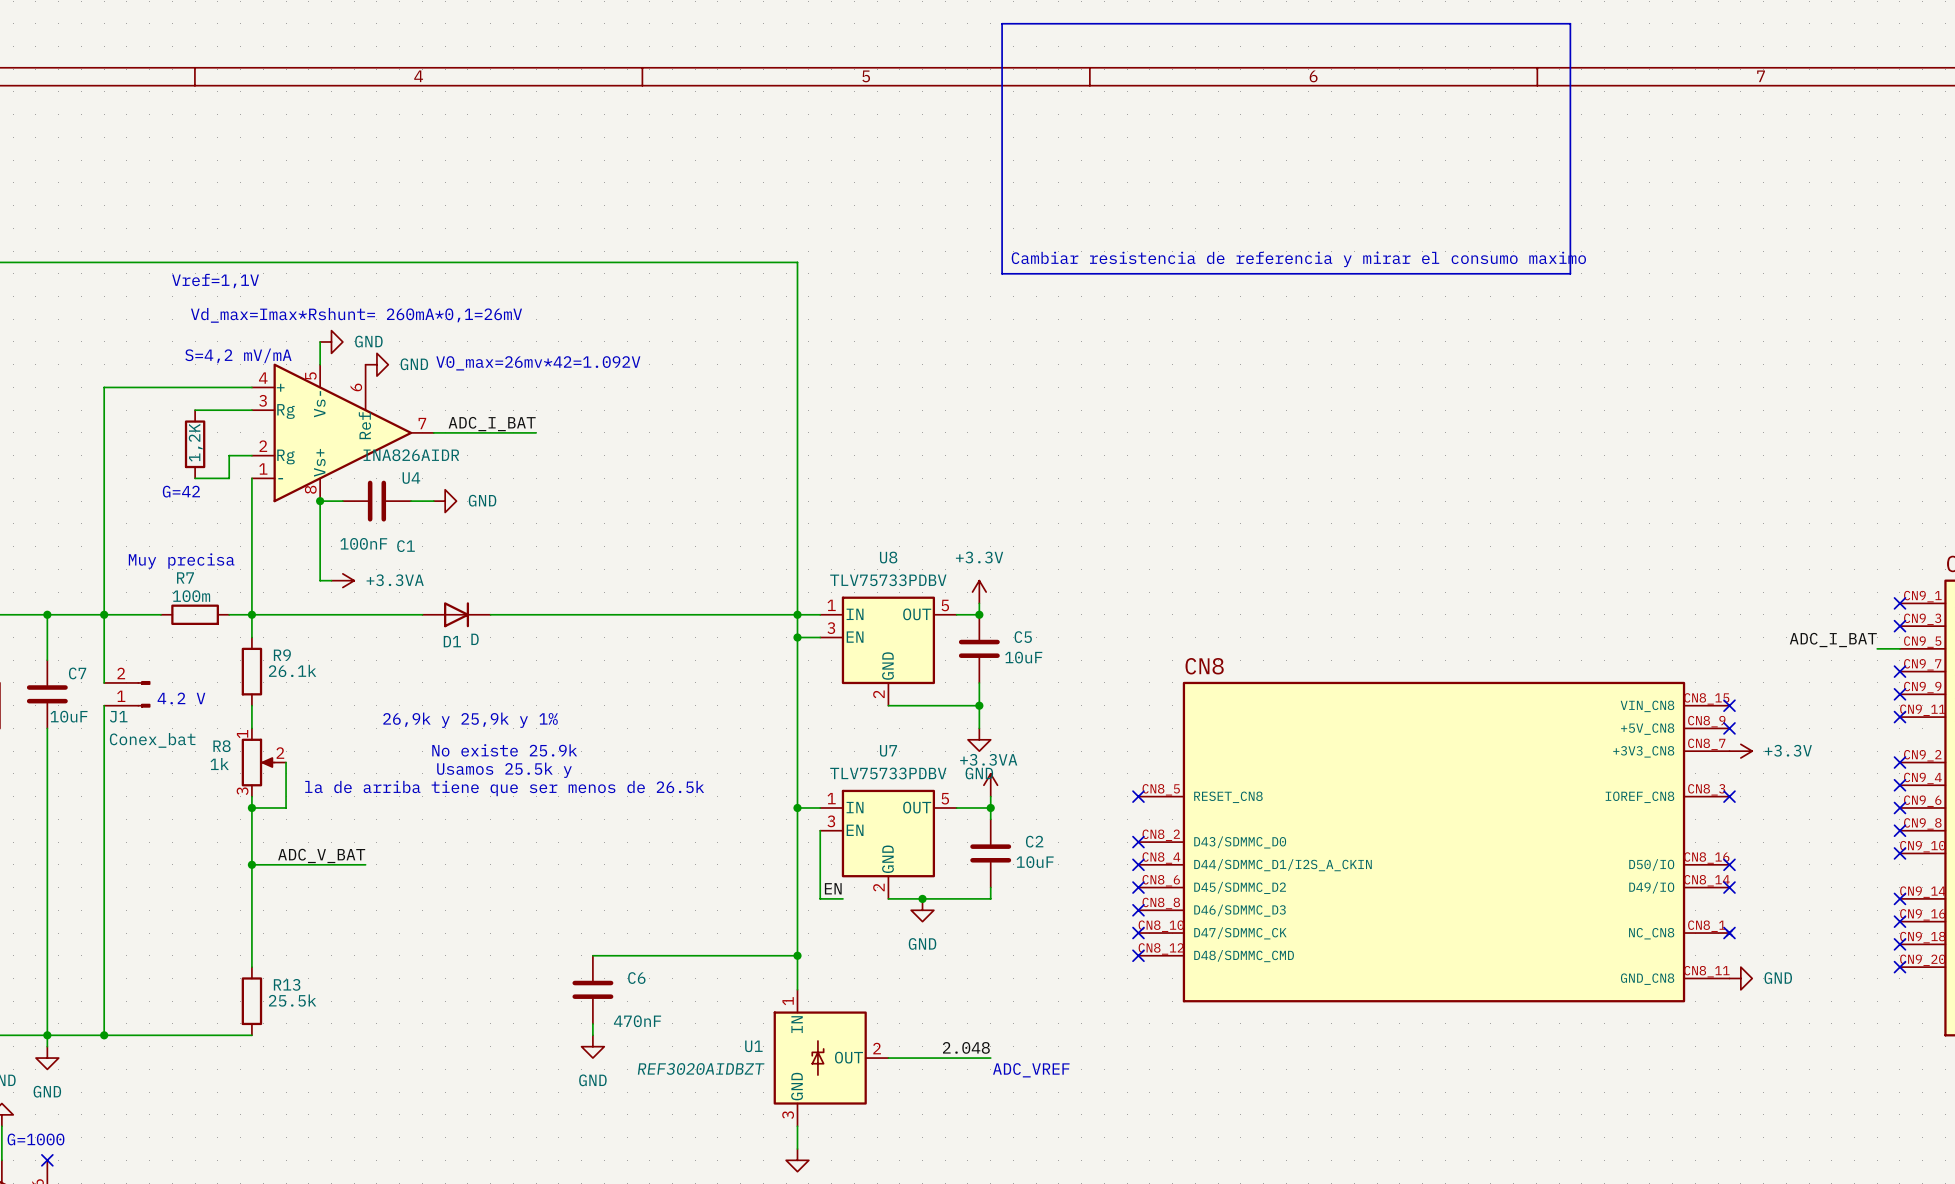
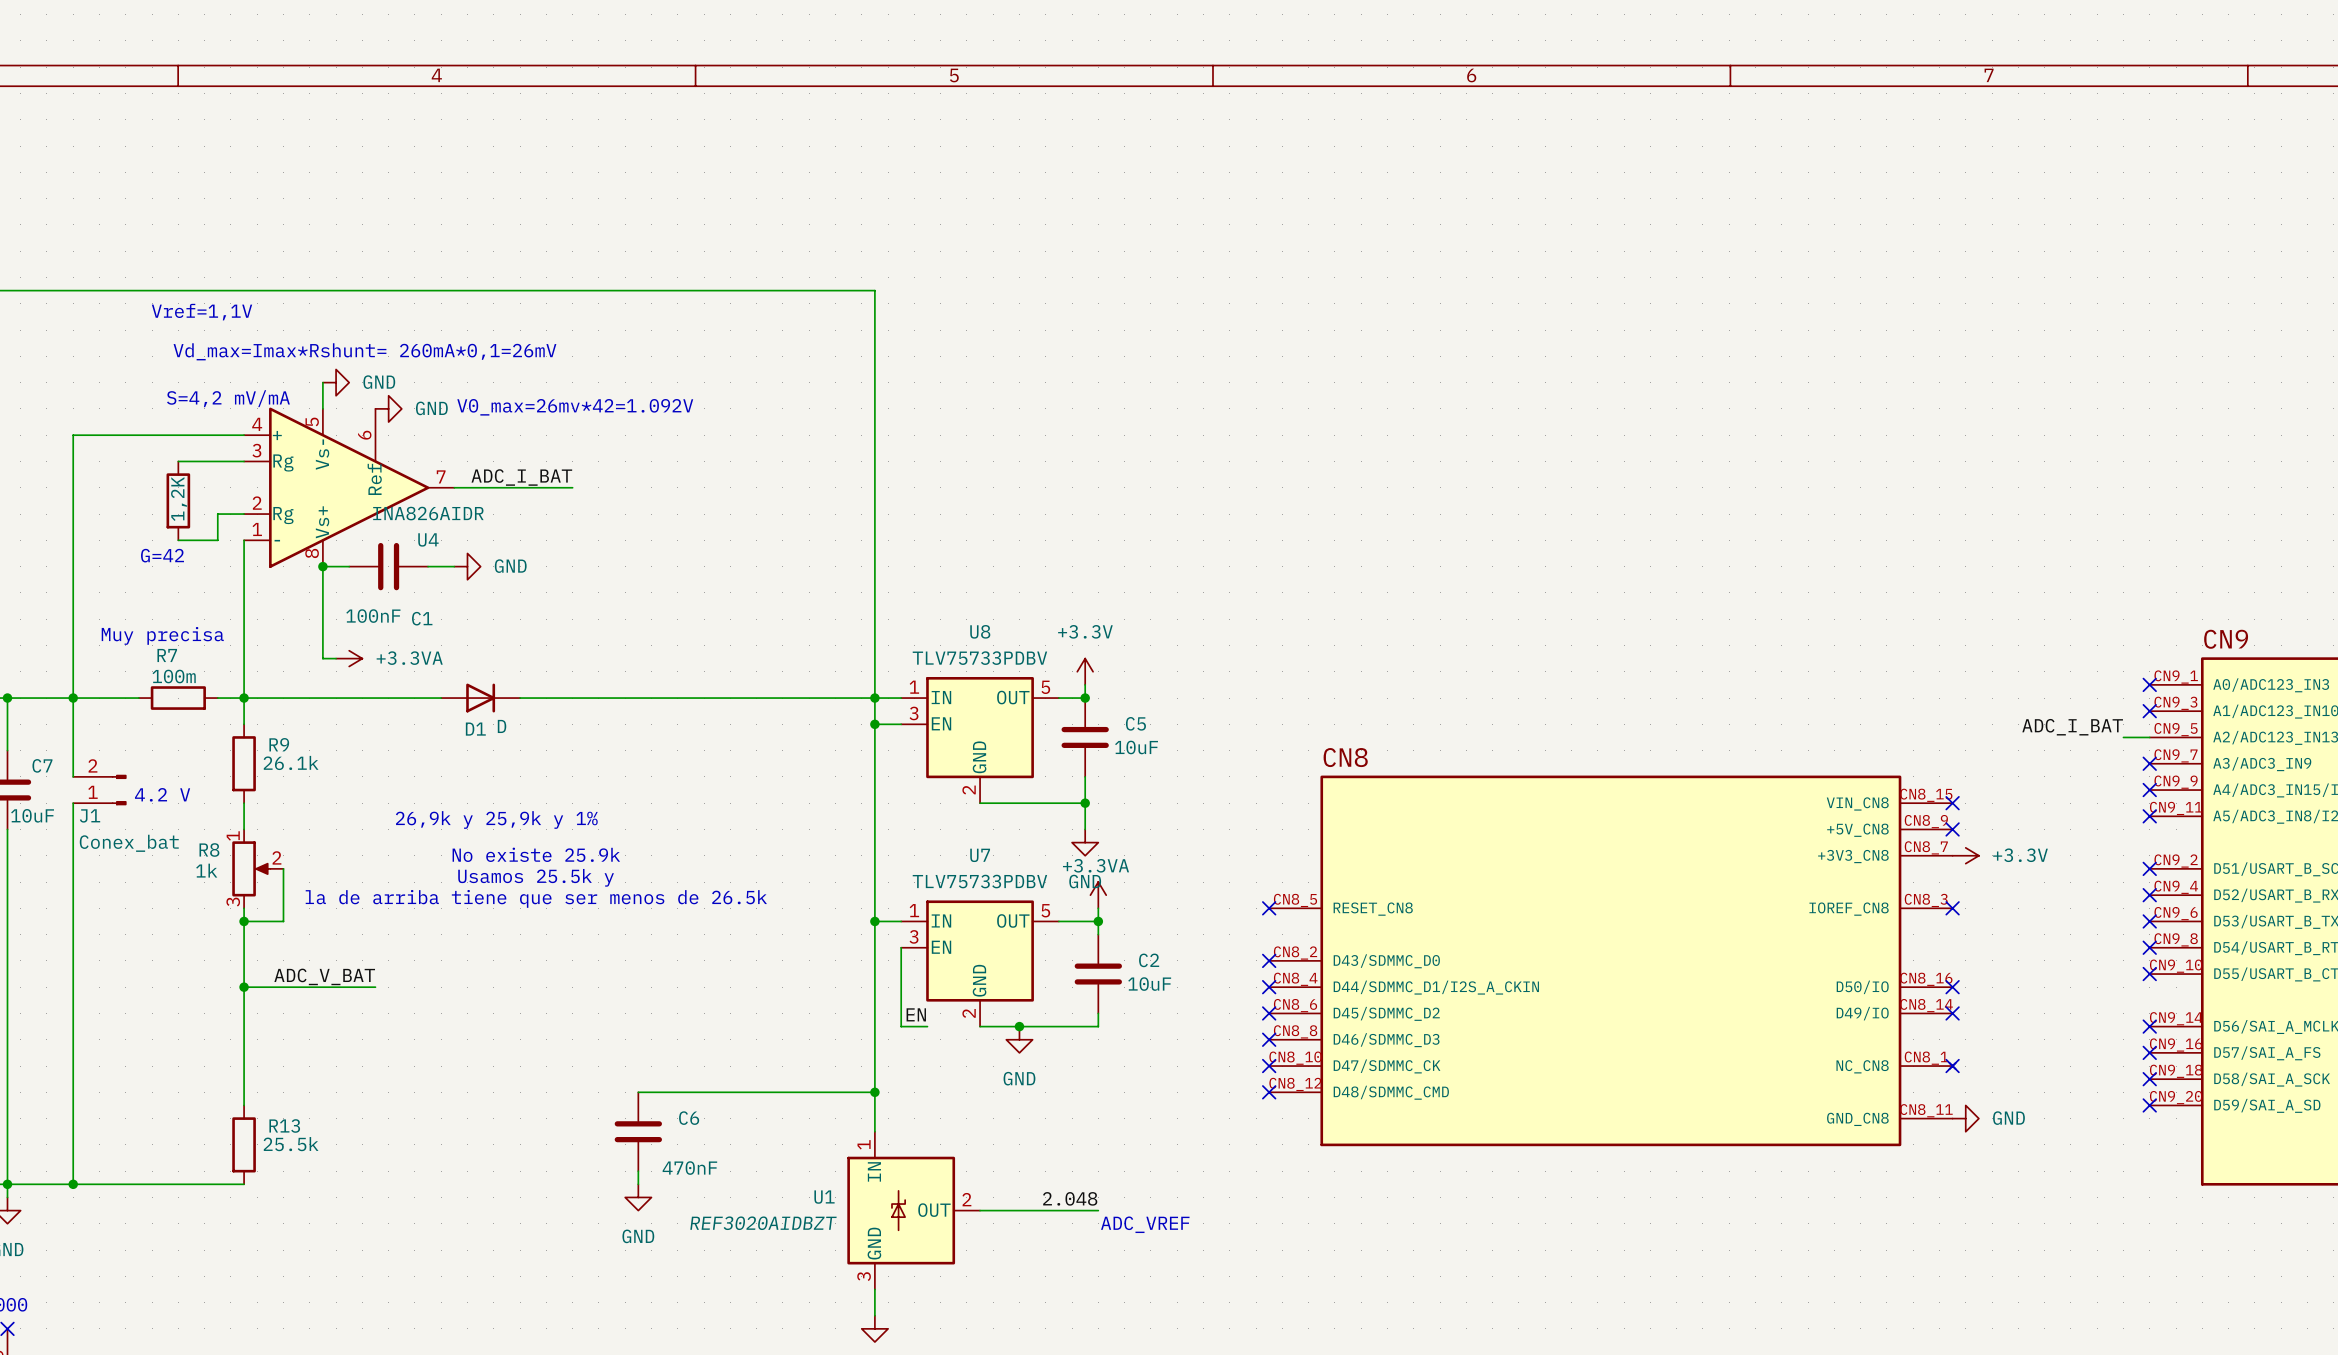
line: (1002, 23) (1570, 23) (1570, 273) (1002, 273) (1002, 23) -> none
text: Cambiar resistencia de referencia y mirar el consumo maximo (1298, 259) -> none

